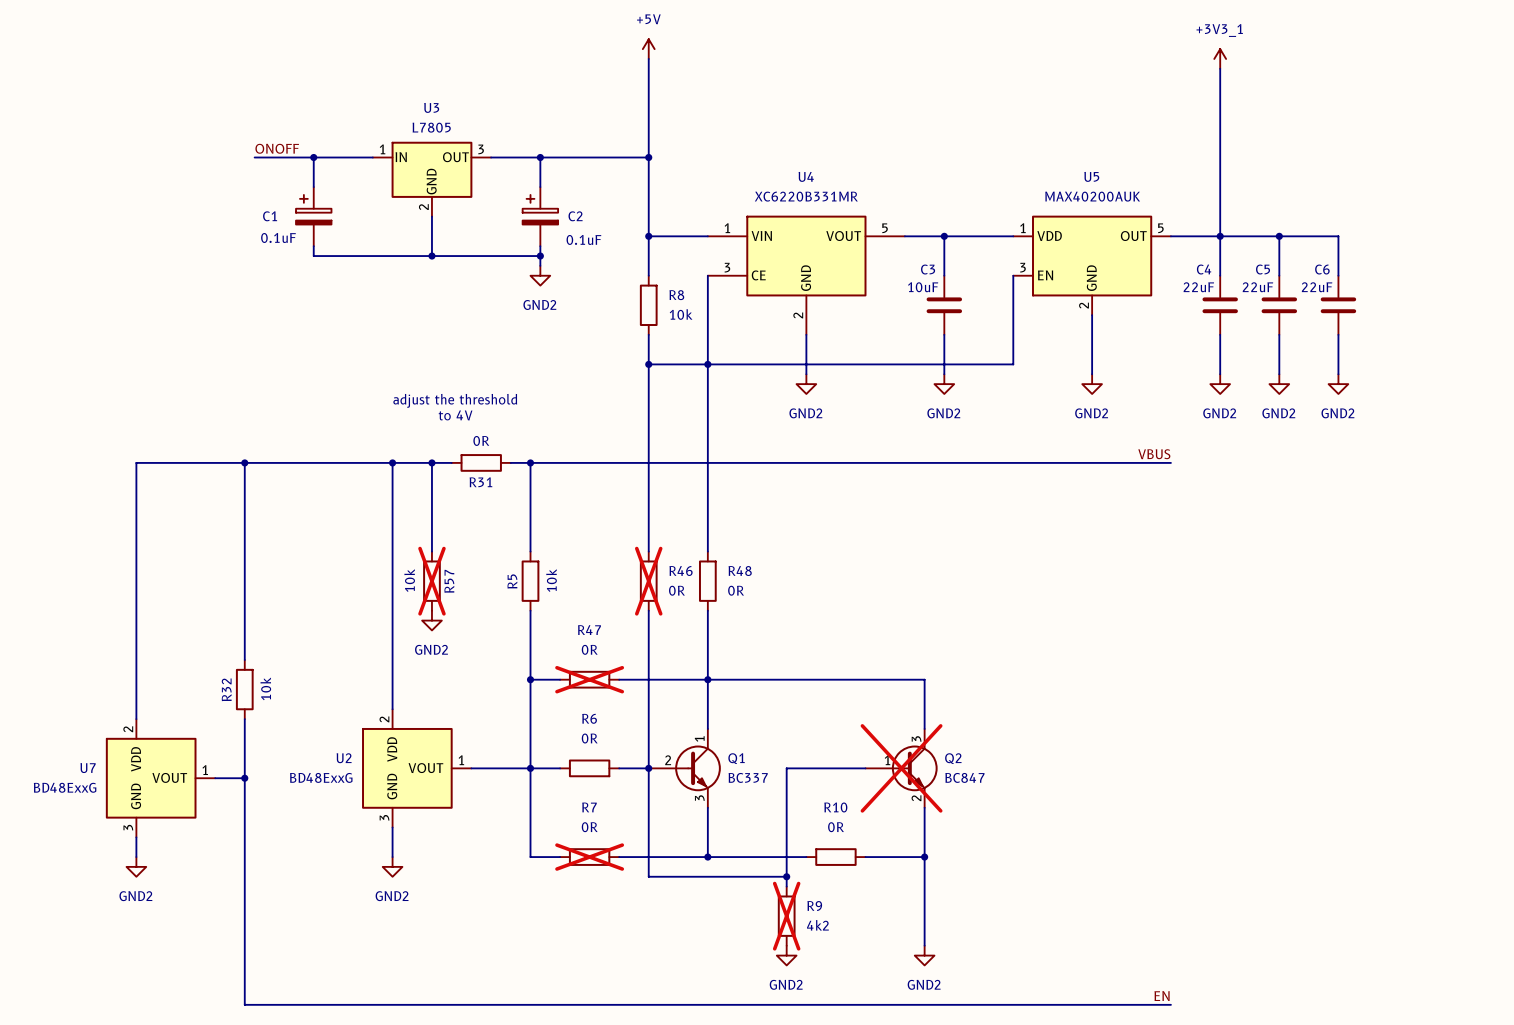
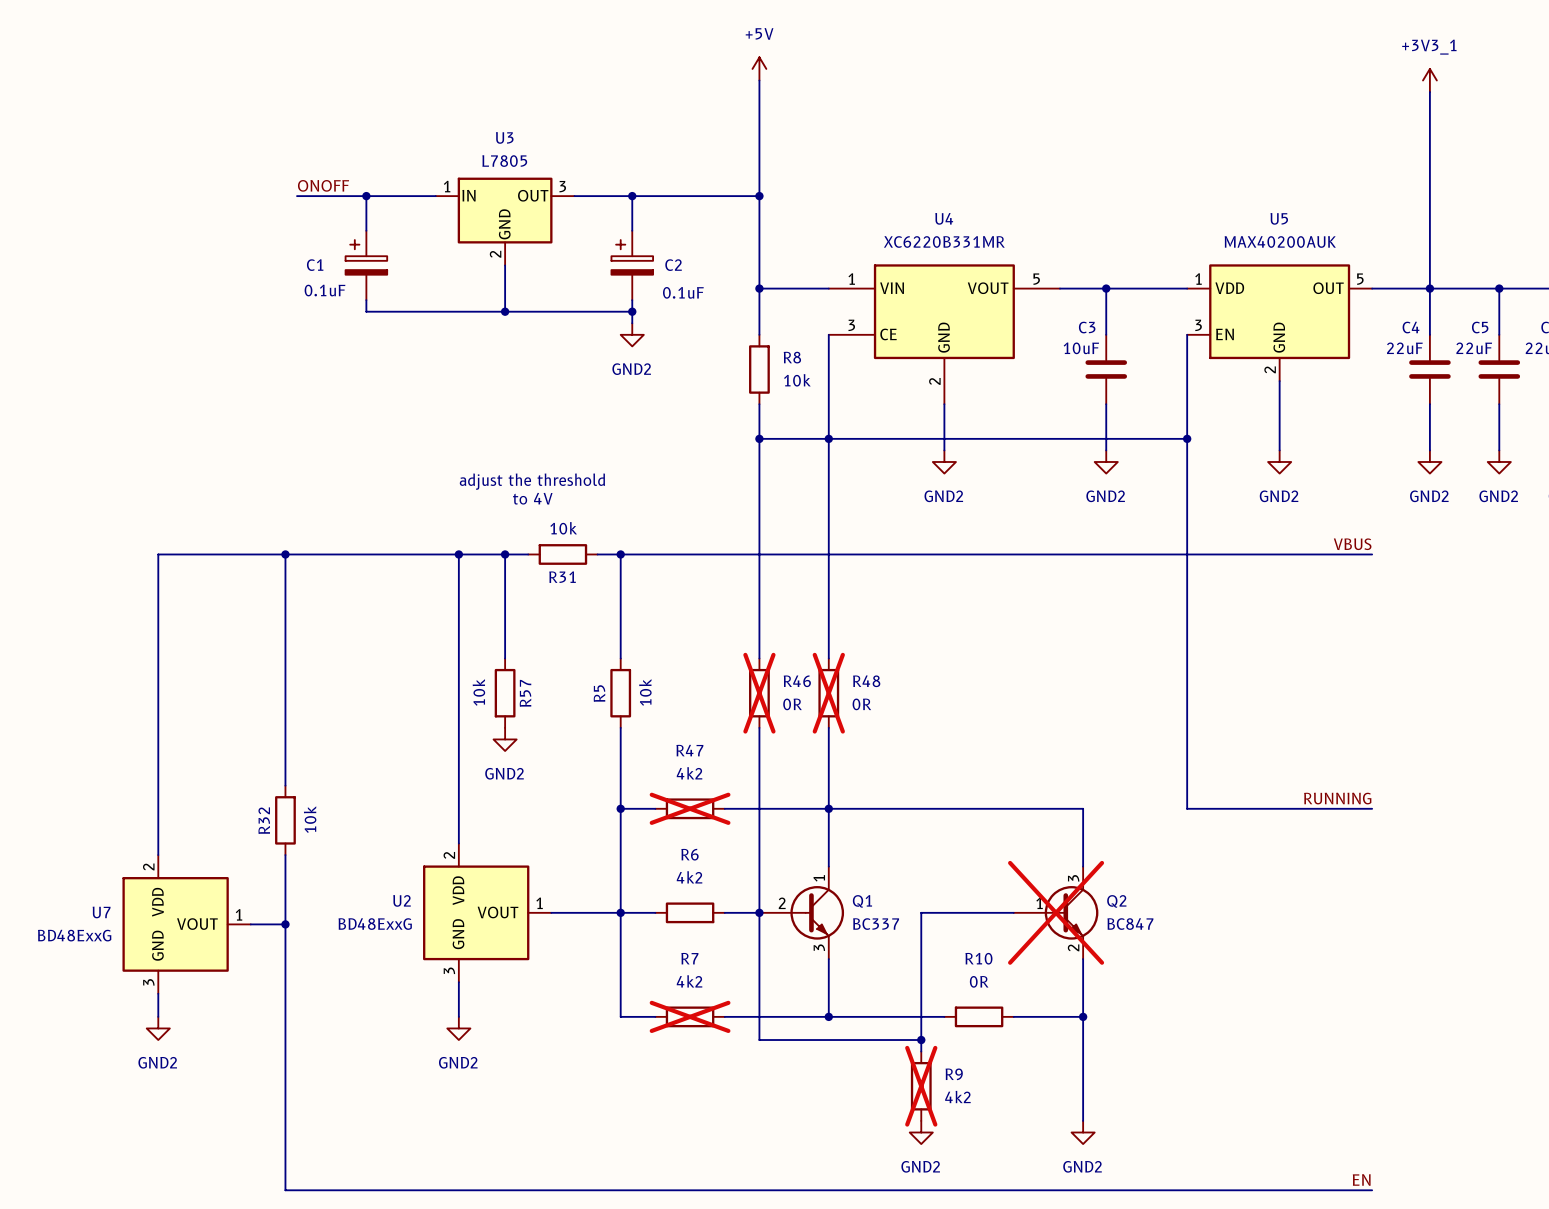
wire: none -> (1187, 438) (1187, 808) (1372, 808)
junction: none -> (1187, 438)
R31 value: 0R (481, 440) -> 10k (563, 528)
R57 do-not-place cross: (431, 581) -> none
R48 do-not-place cross: none -> (828, 693)
R47 value: 0R (589, 649) -> 4k2 (689, 773)
label: none -> RUNNING (1337, 798)
R6 value: 0R (589, 738) -> 4k2 (689, 877)
R7 value: 0R (589, 827) -> 4k2 (689, 981)

